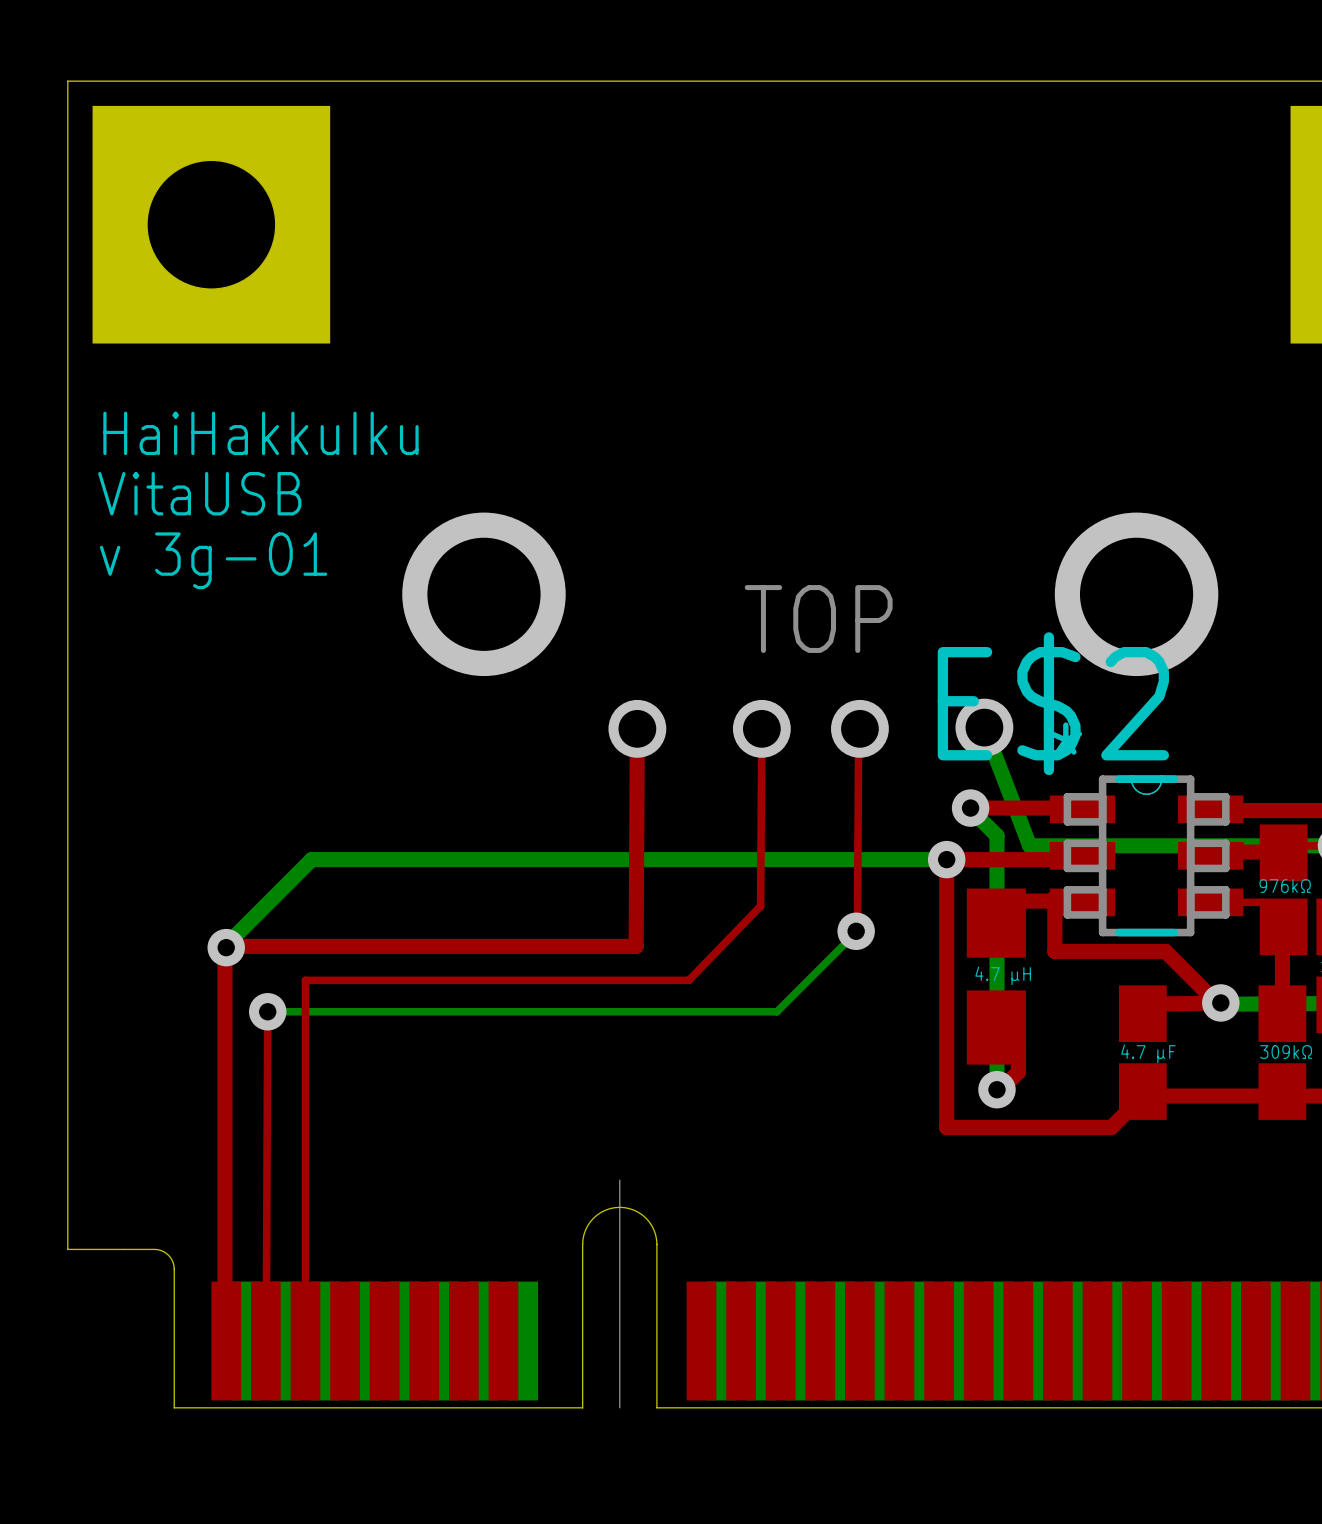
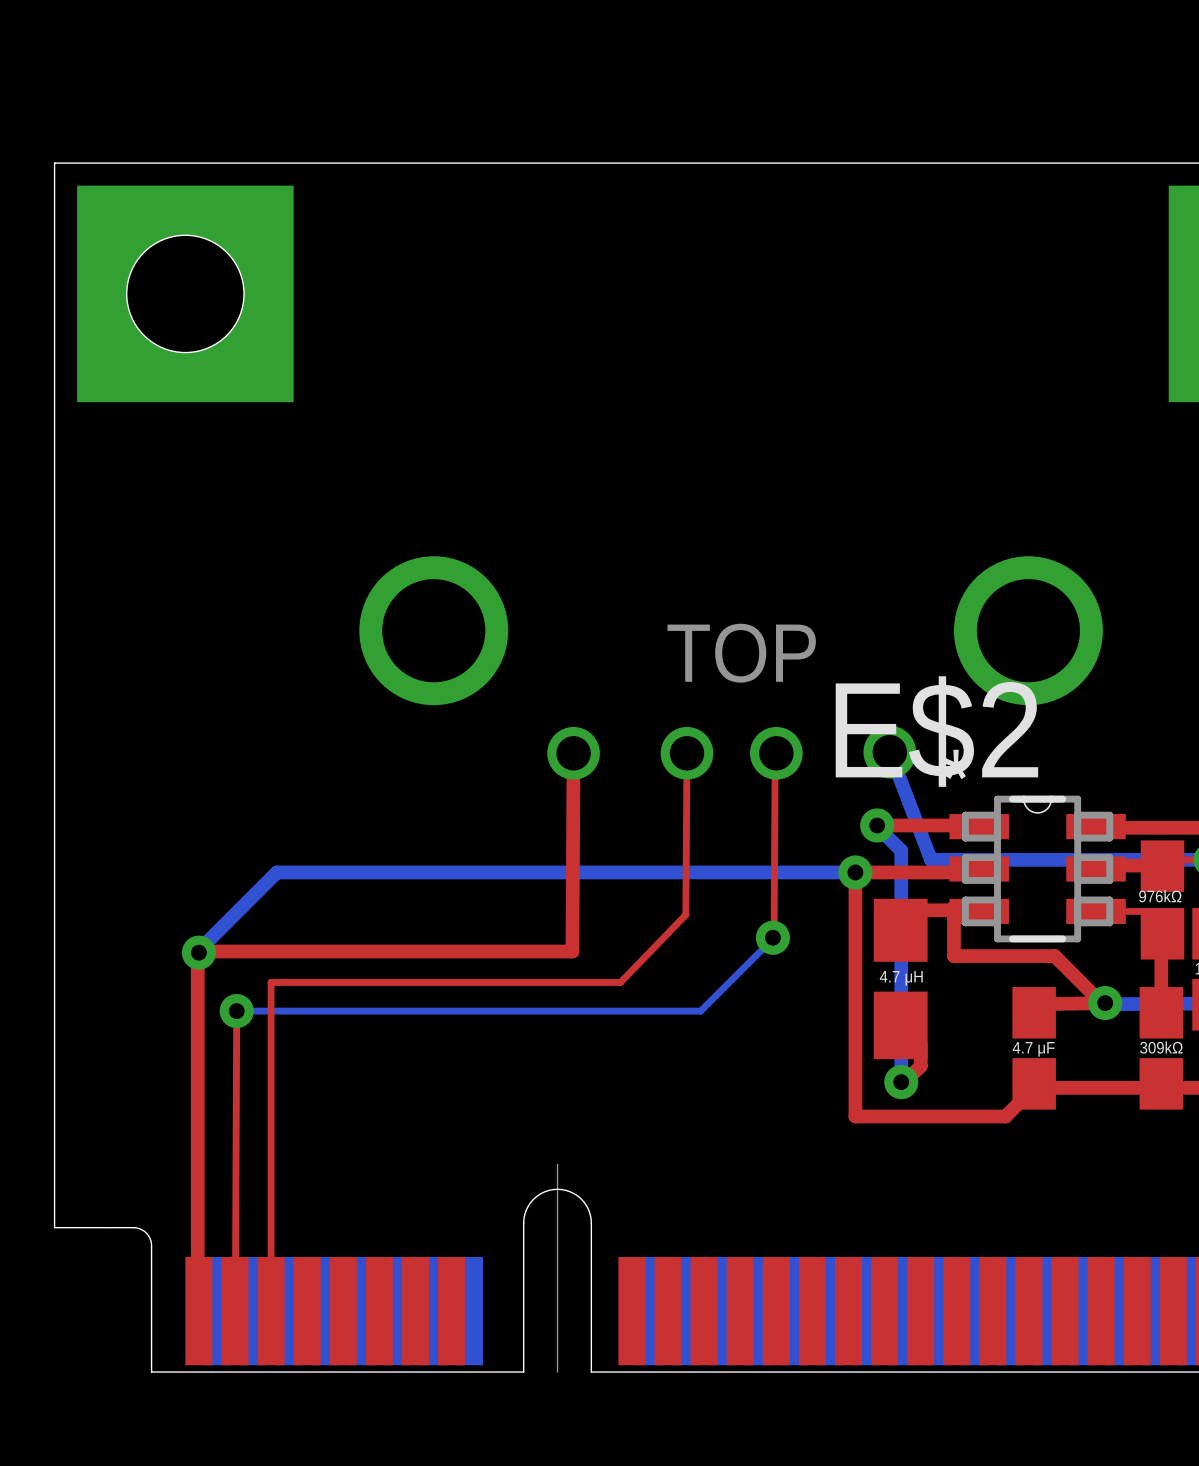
text: HaiHakkuIku (260, 433) -> none
text: VitaUSB (199, 493) -> none
text: v 3g-01 (213, 560) -> none

